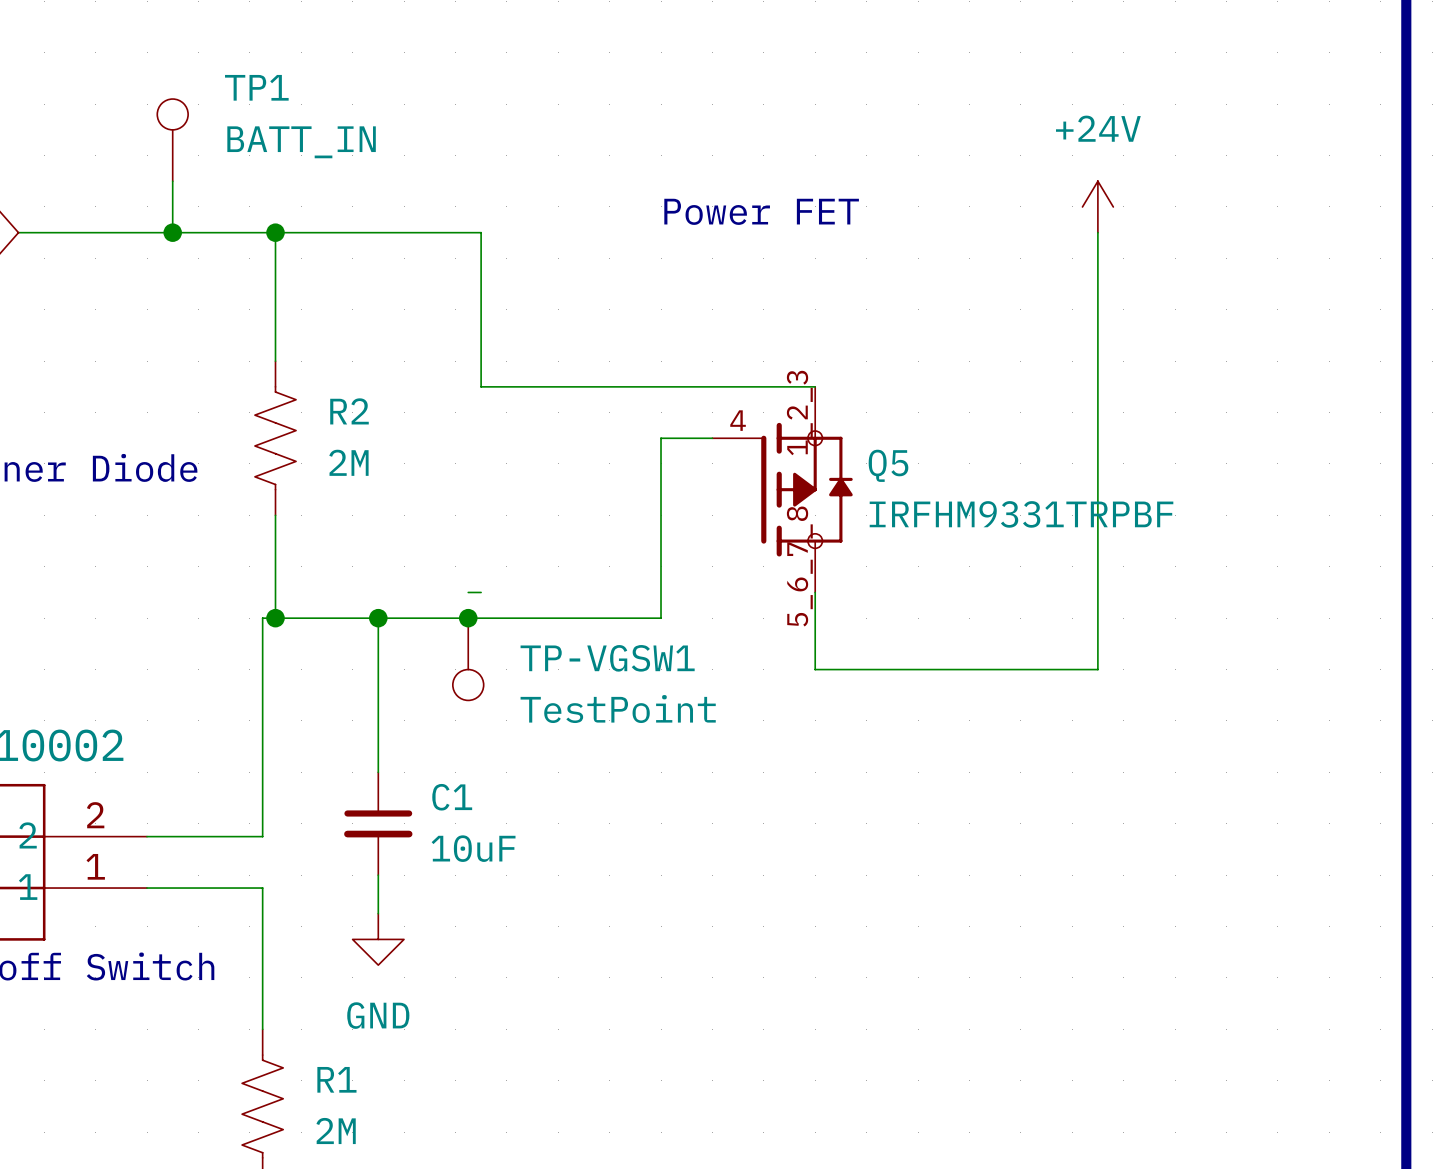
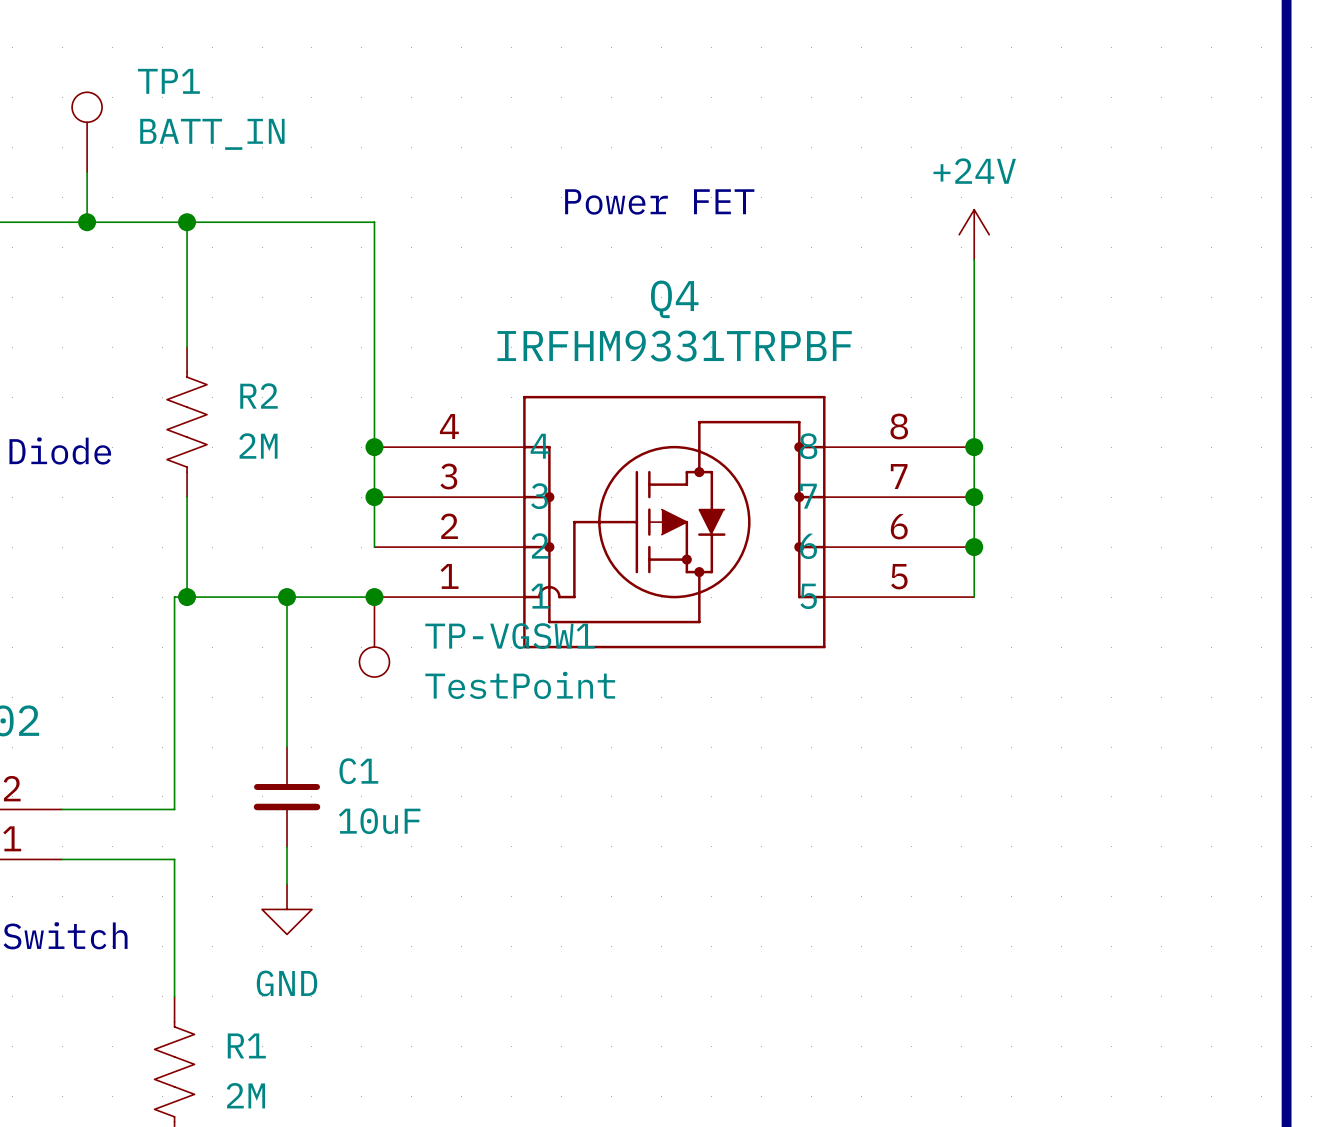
power symbol text position: +24V (1098, 128) -> +24V (974, 171)
power symbol position: +24V (1097, 206) -> +24V (974, 234)
wire: (468, 232) (481, 232) (481, 386) (815, 386) -> (374, 222) (374, 547)
wire: (1097, 232) (1097, 669) (815, 669) (815, 592) -> none
wire: none -> (974, 259) (974, 597)
wire: (712, 438) (661, 438) (661, 618) (468, 618) -> none
junction: none -> (374, 447)
junction: none -> (974, 447)
Q5: IRFHM9331TRPBF (782, 489) -> none
junction: none -> (374, 497)
junction: none -> (974, 497)
Q4: none -> IRFHM9331TRPBF (674, 522)
junction: none -> (974, 547)
wire: (468, 592) (481, 592) -> none

